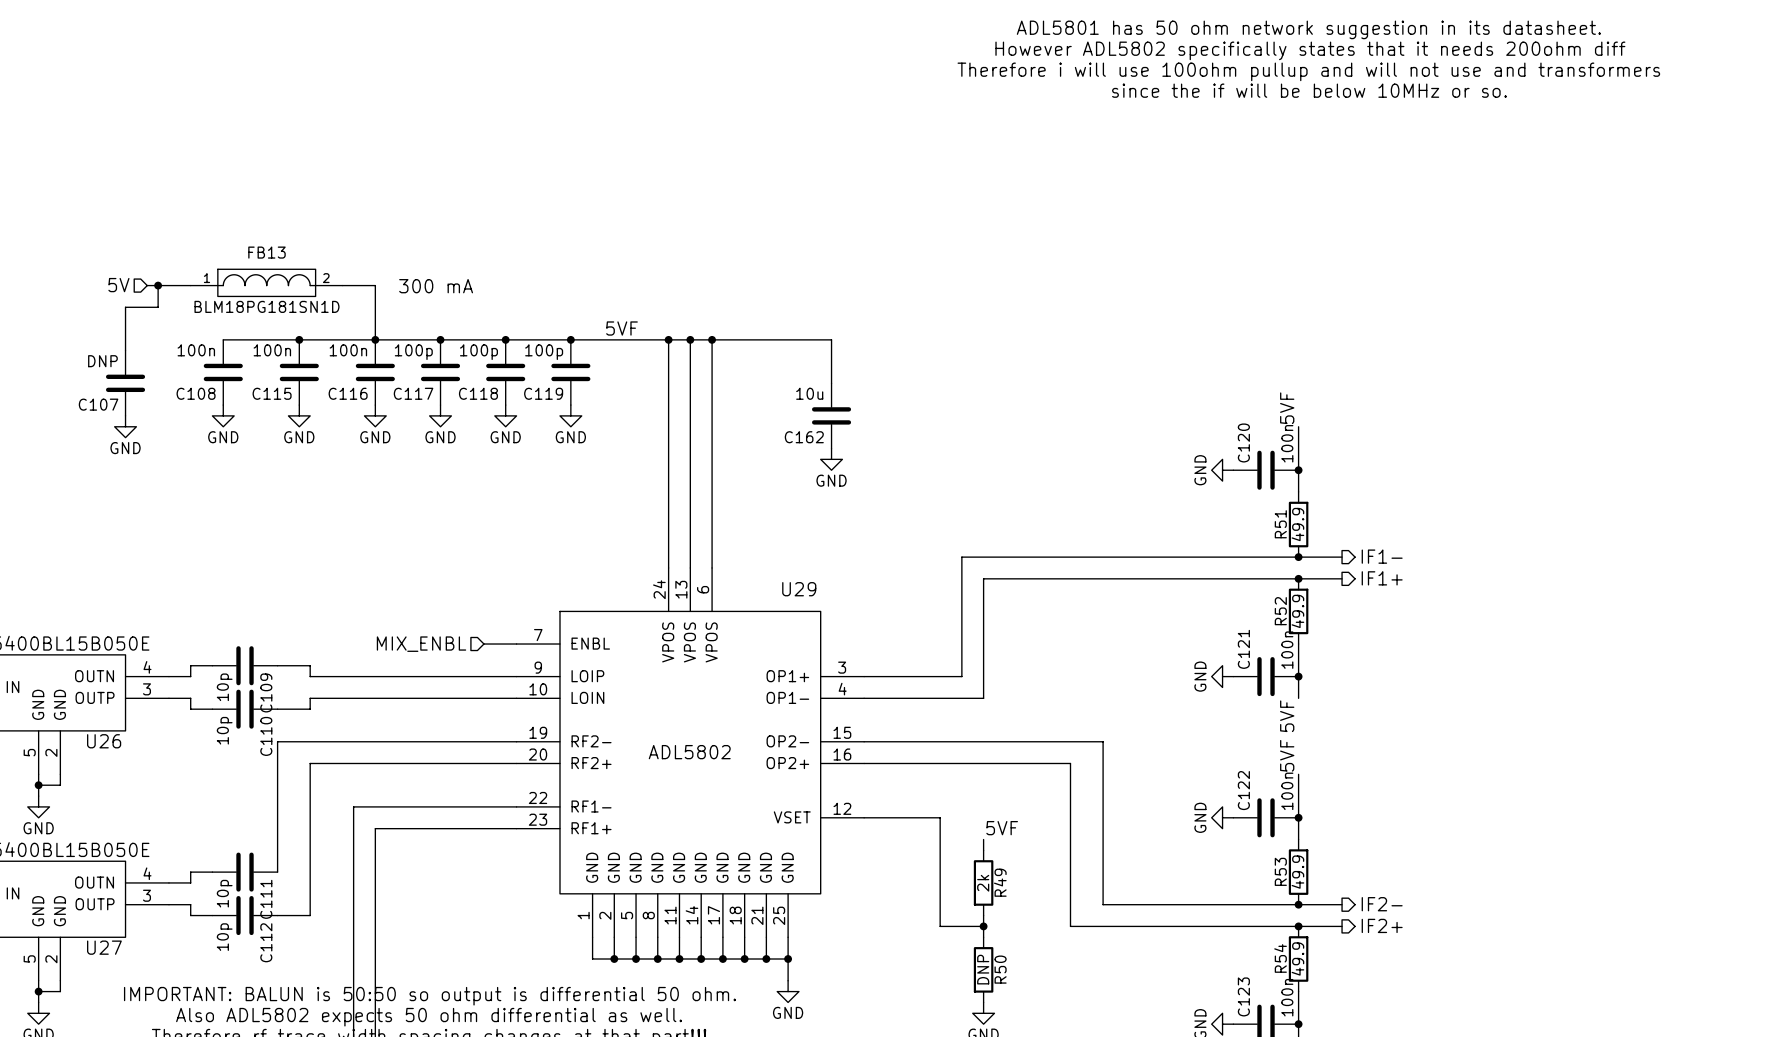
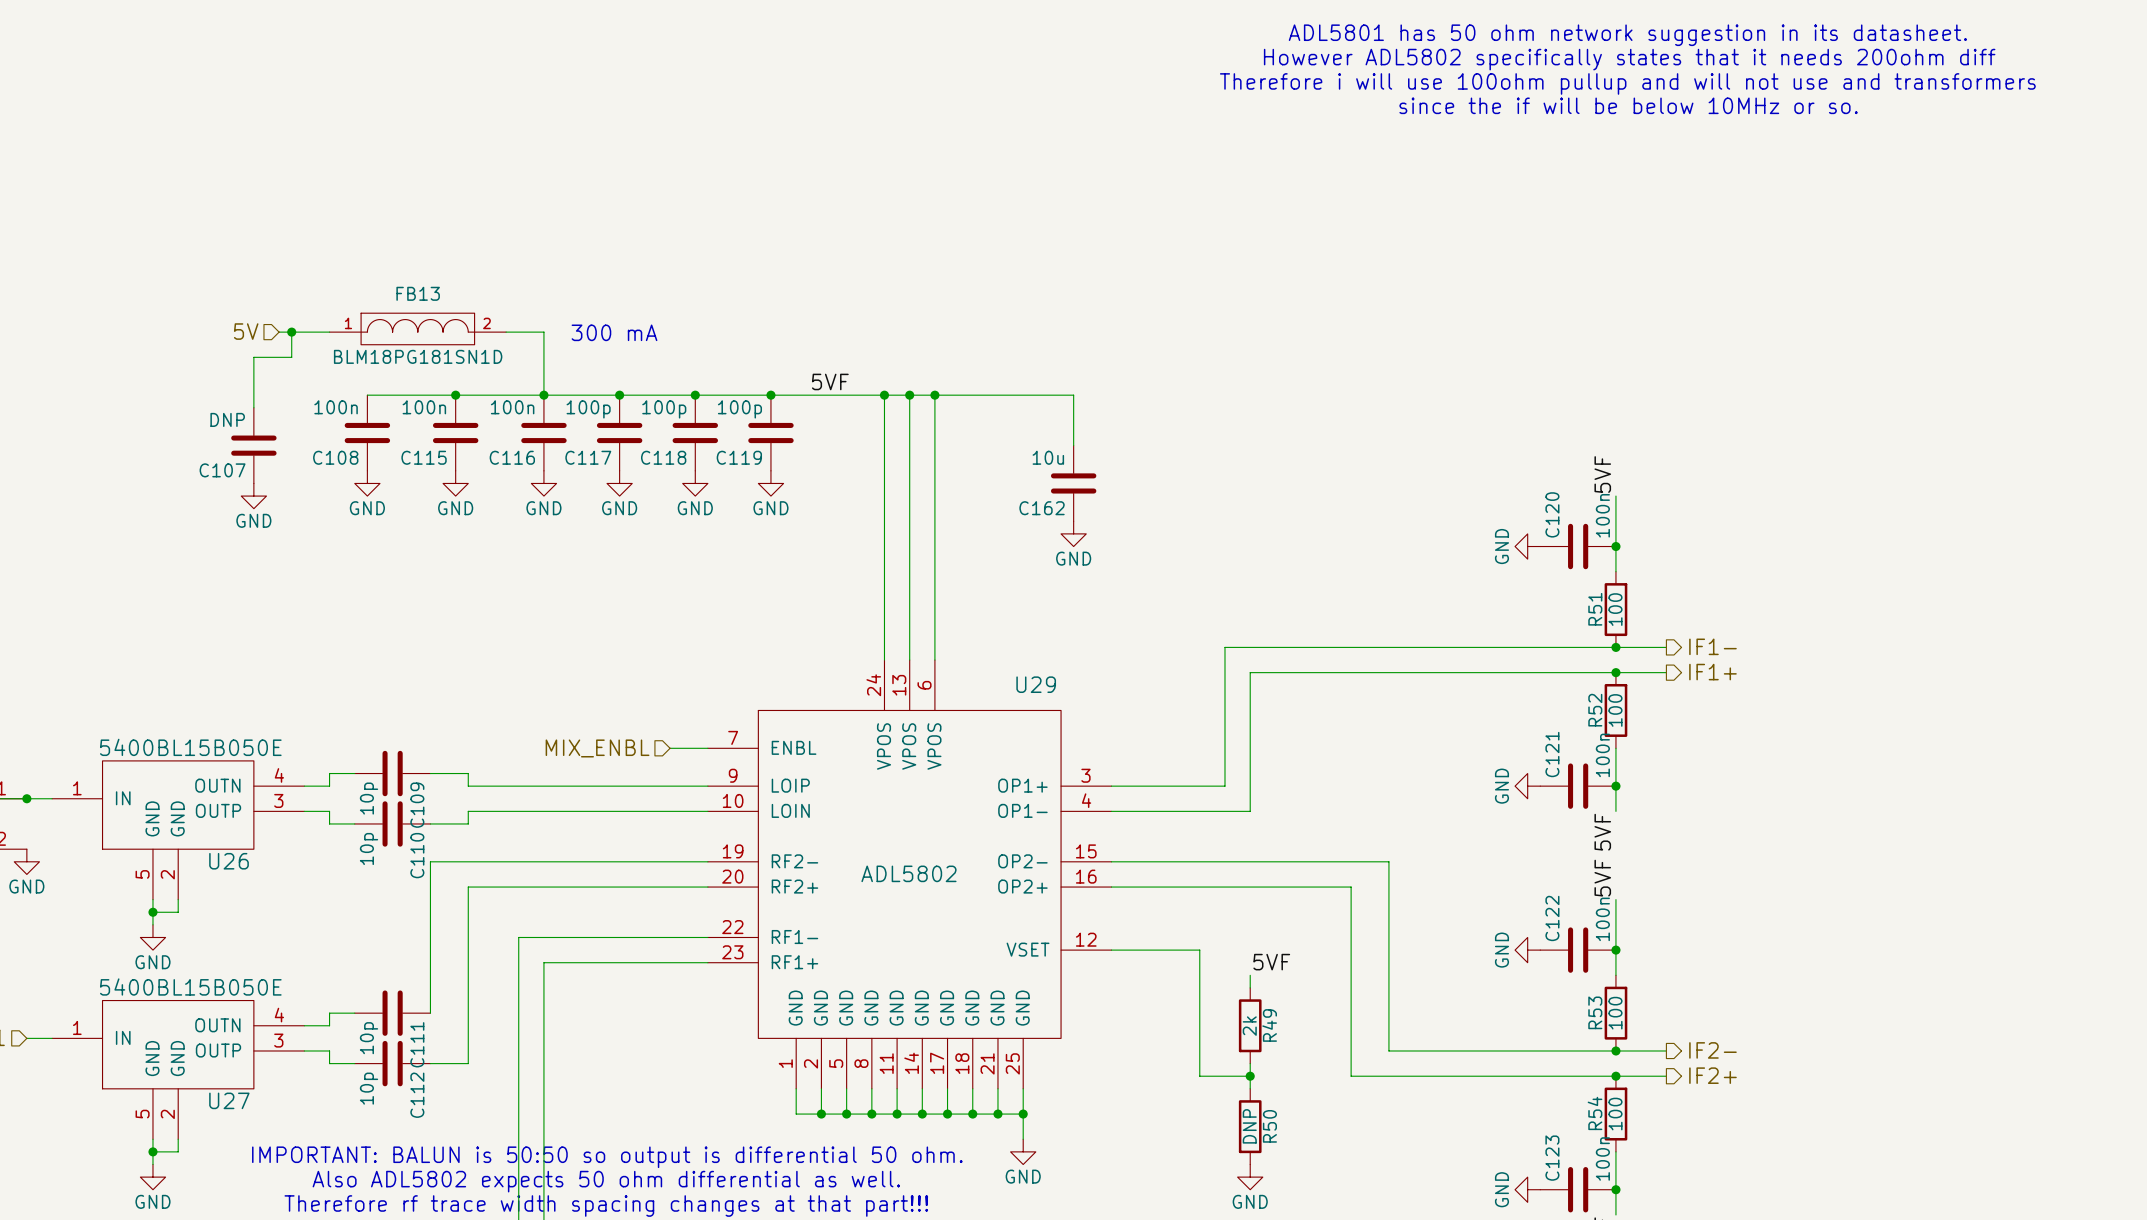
R51 value: 49.9 (1297, 524) -> 100 (1615, 609)
R52 value: 49.9 (1297, 611) -> 100 (1615, 710)
R53 value: 49.9 (1297, 872) -> 100 (1615, 1013)
R54 value: 49.9 (1297, 959) -> 100 (1615, 1114)

